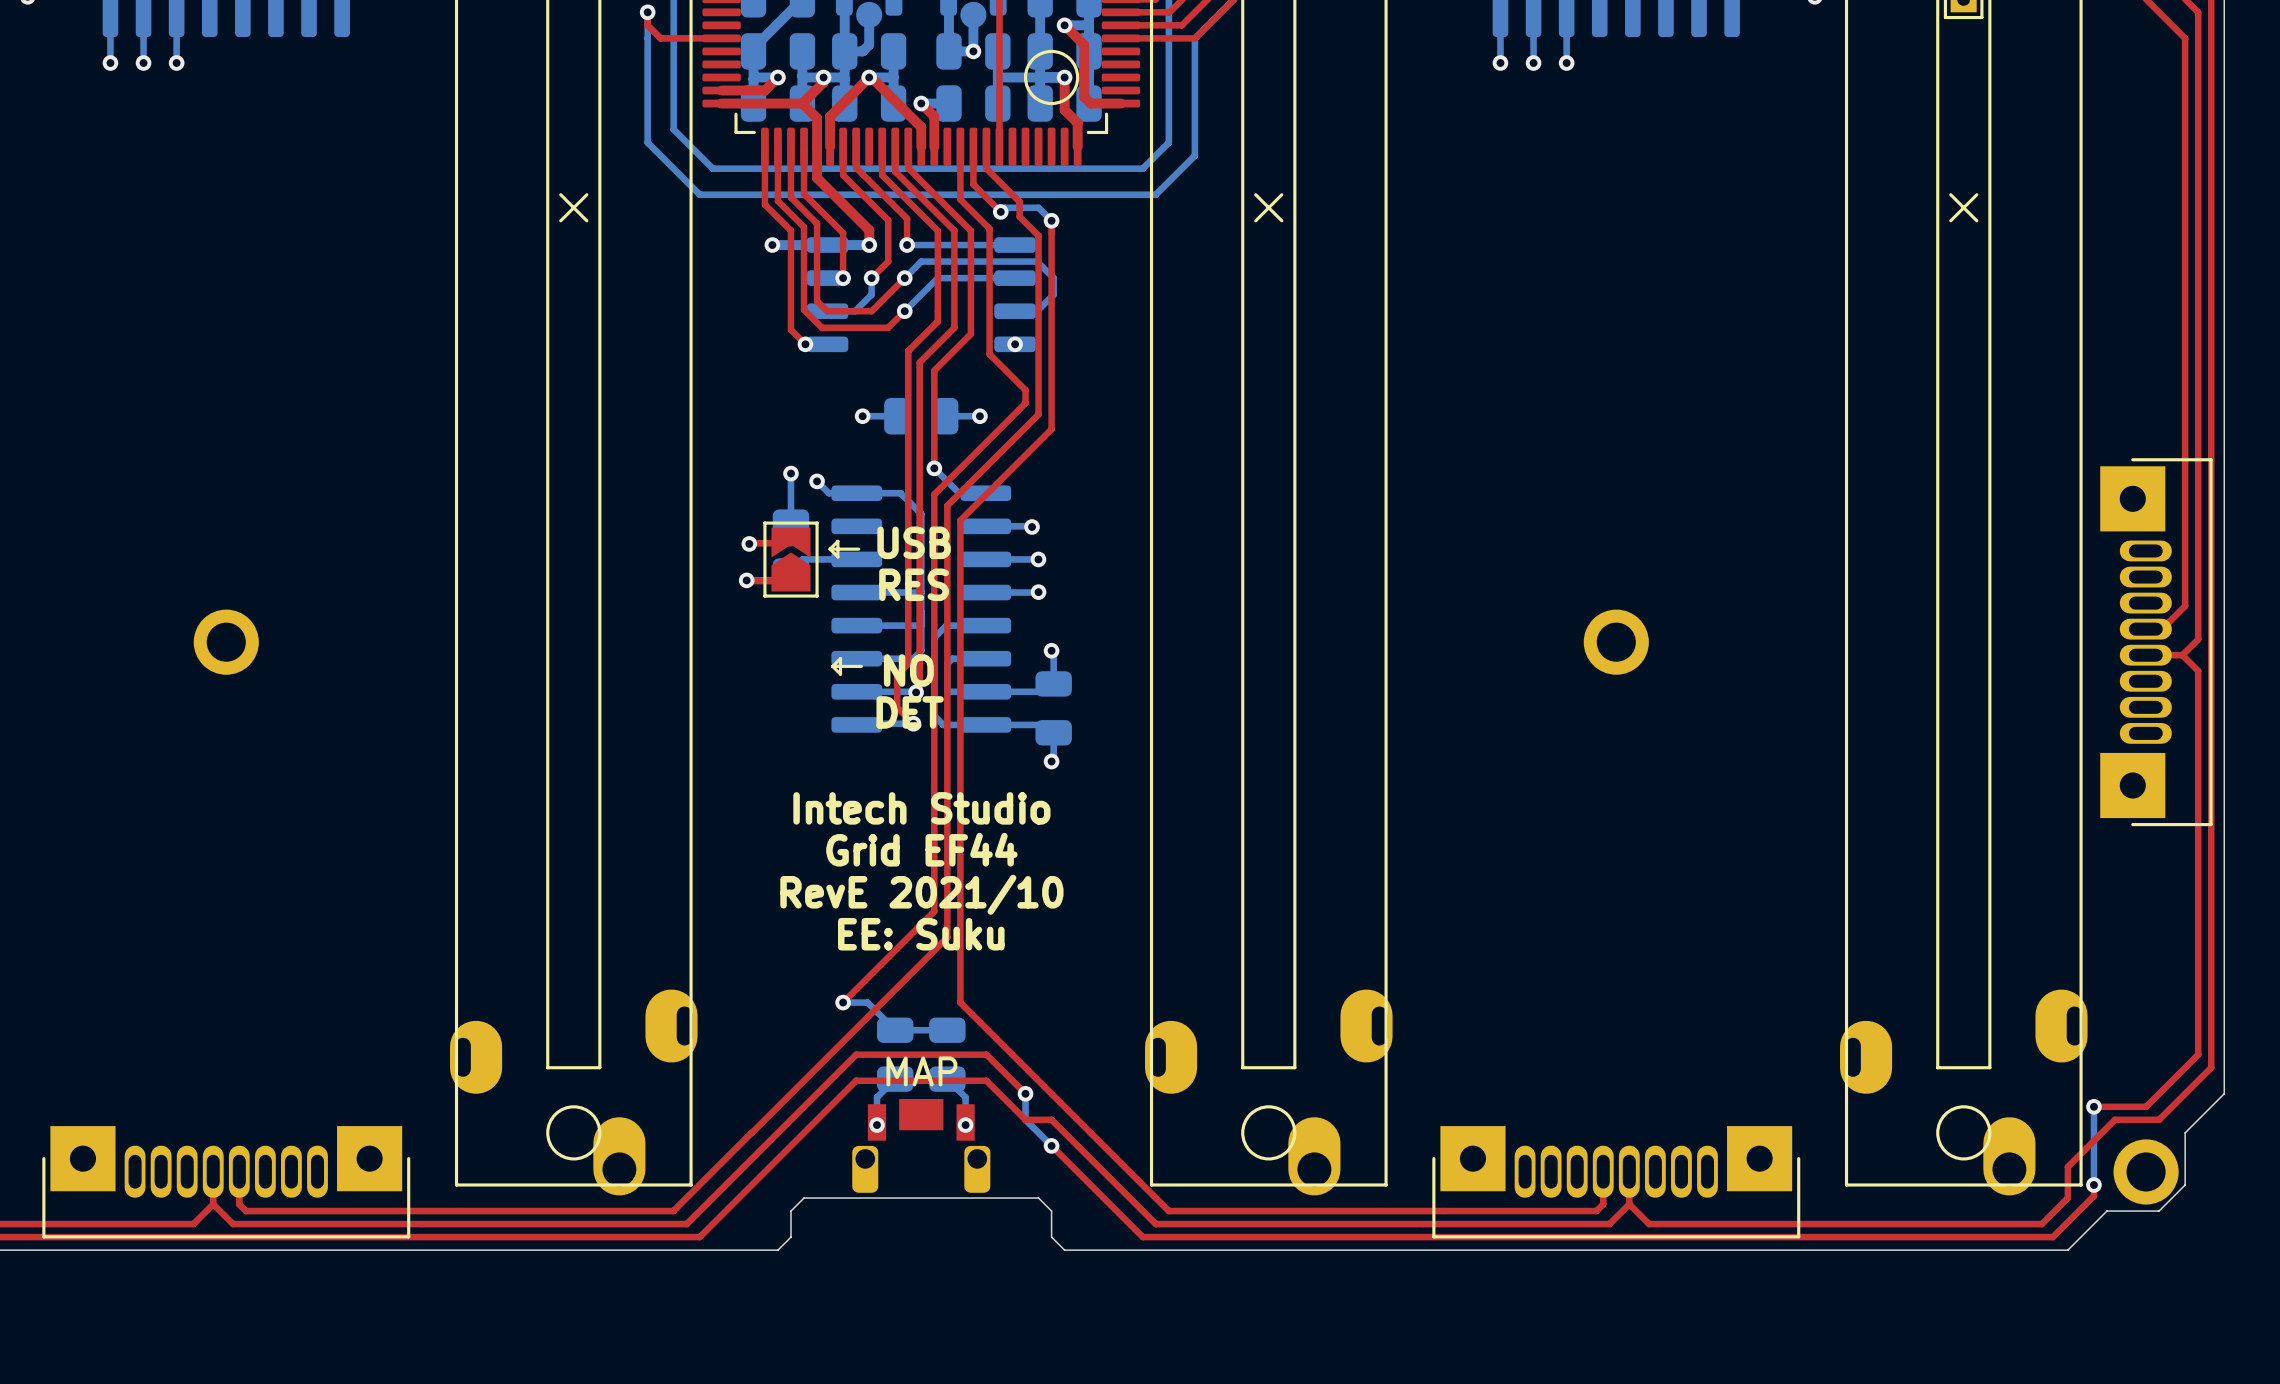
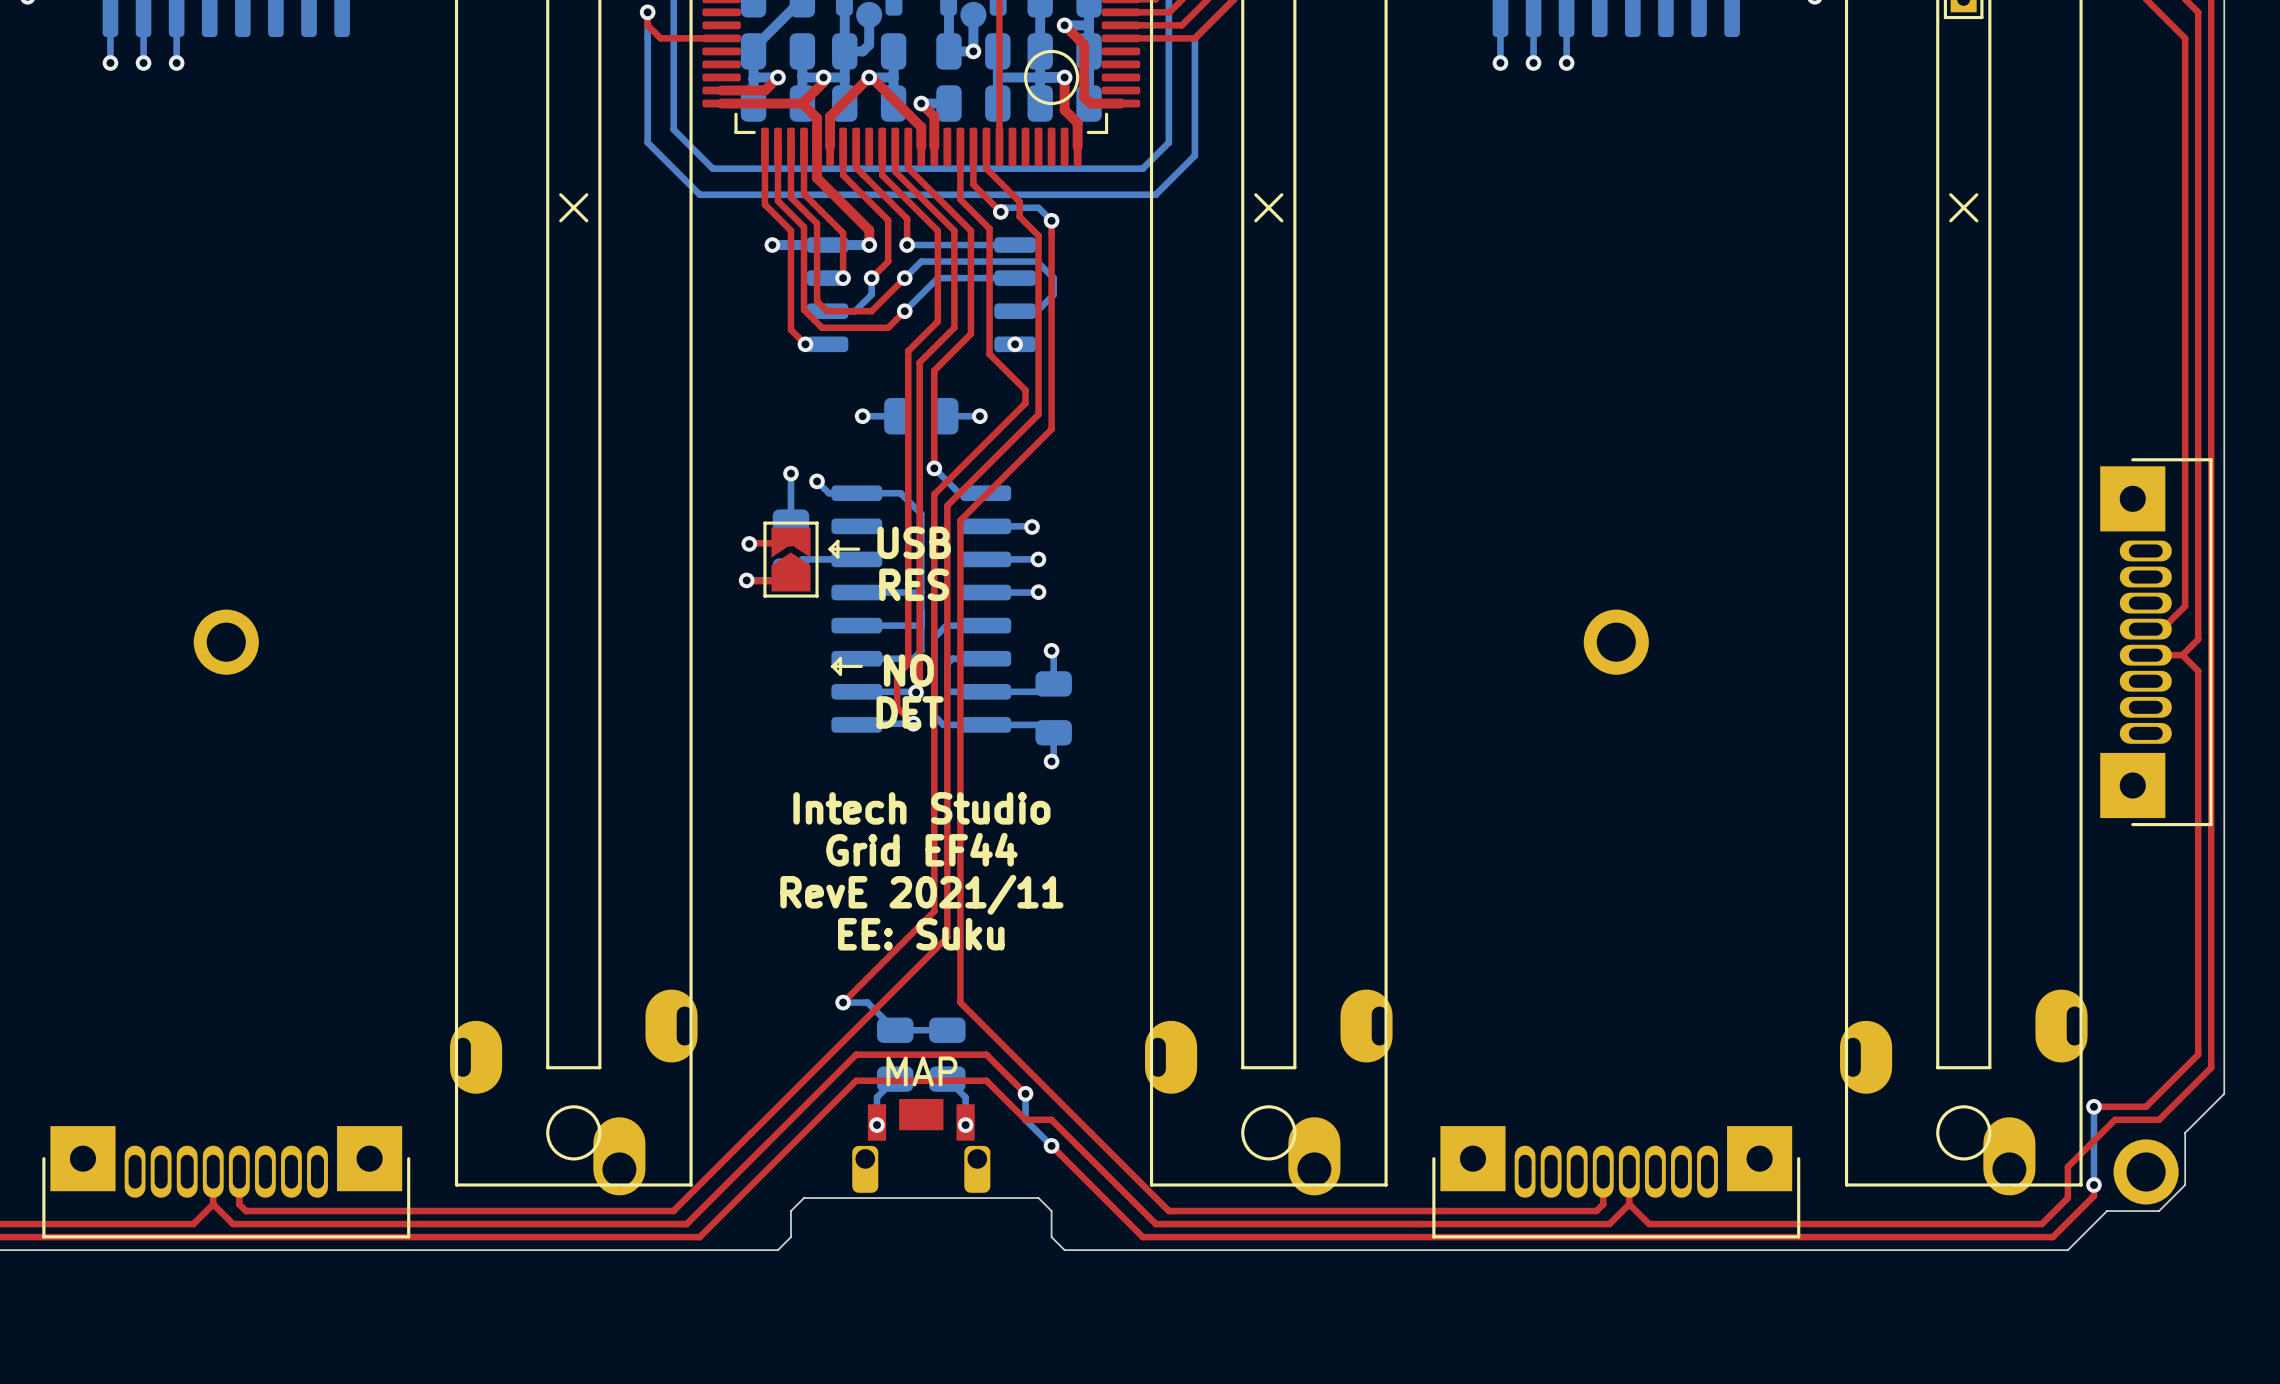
text: RevE 2021/10 (921, 894) -> RevE 2021/11 (921, 894)

